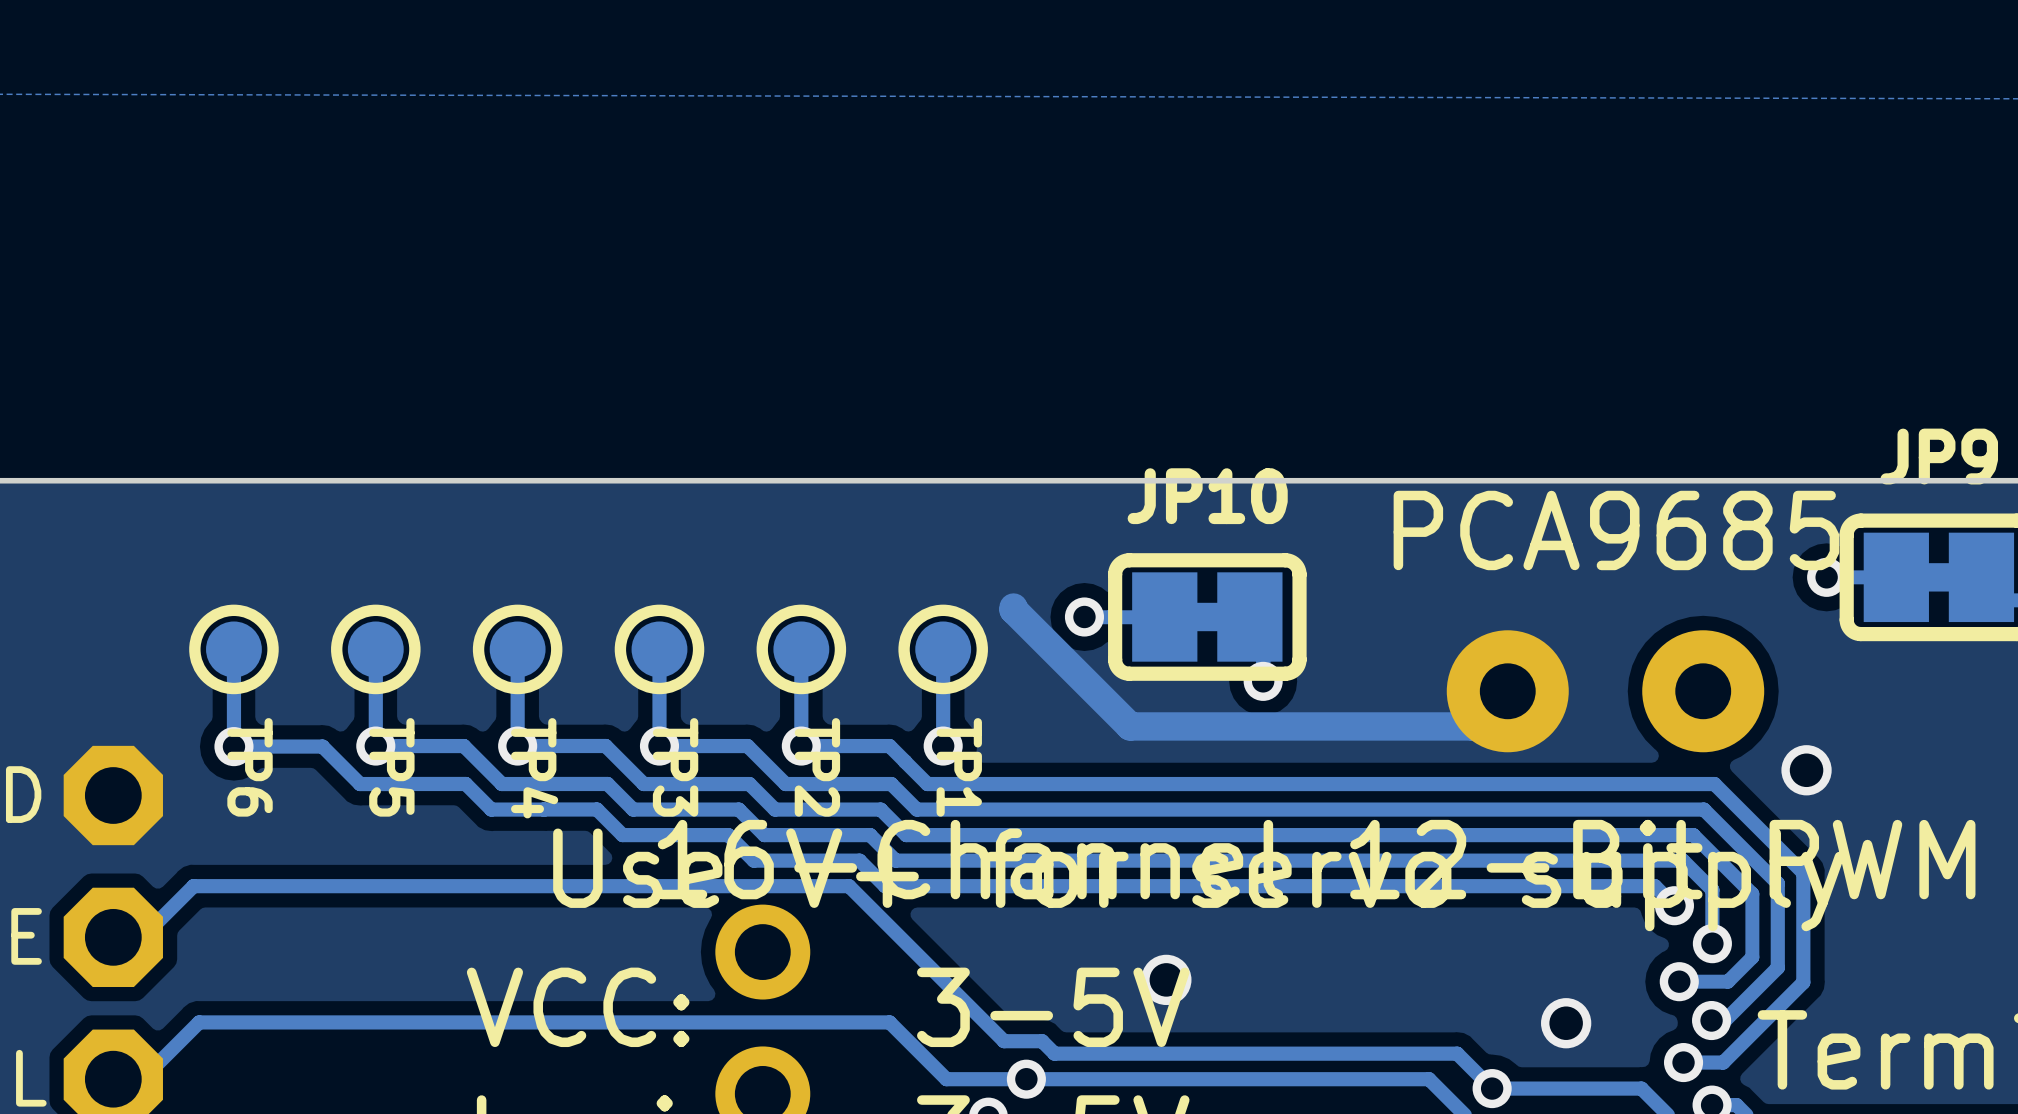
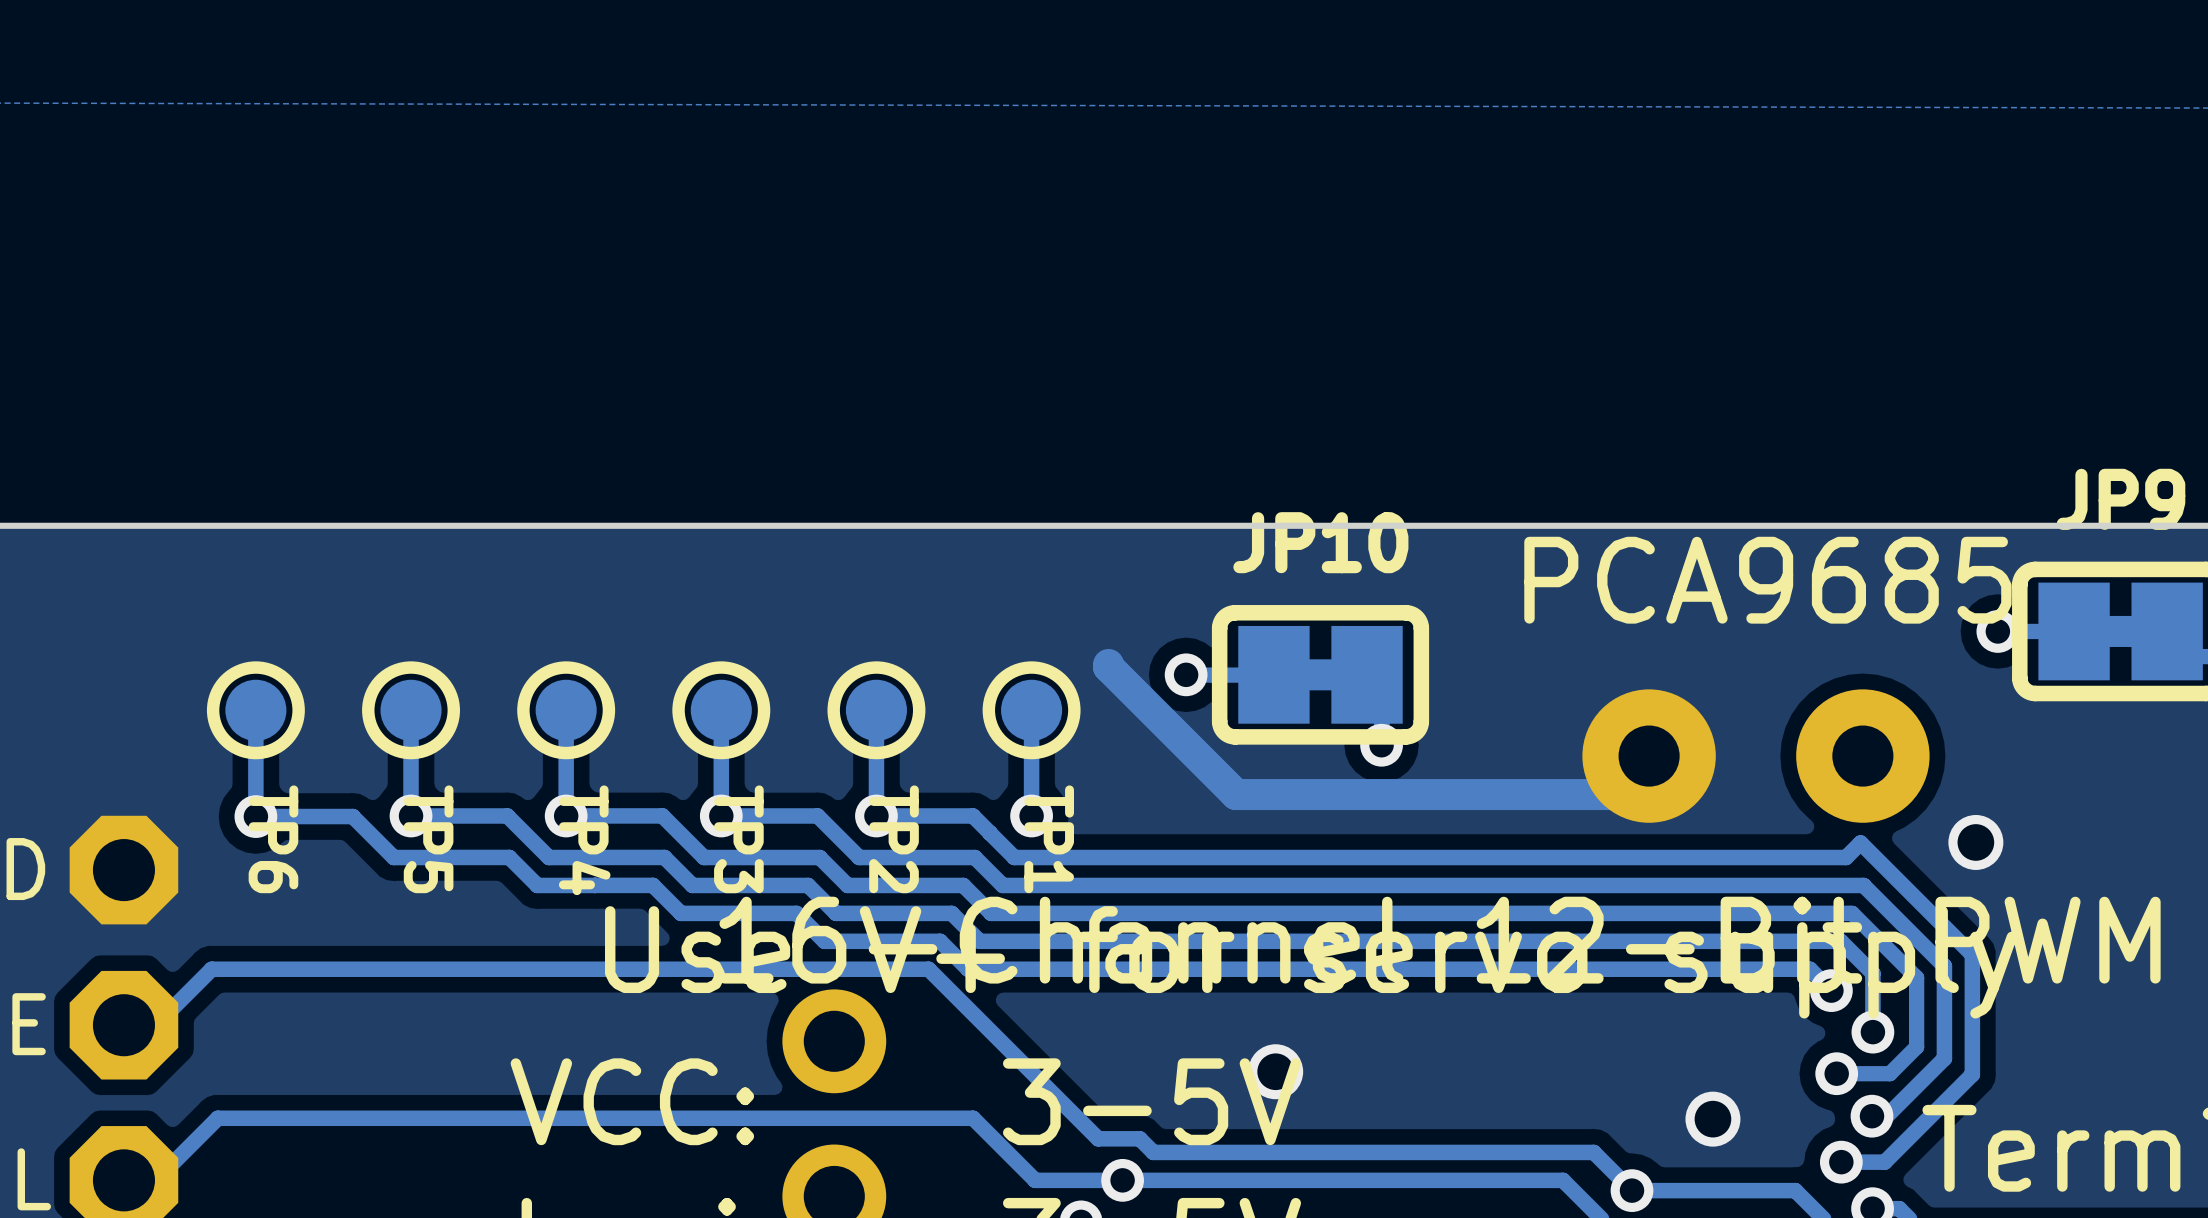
track: (1714, 784) (1687, 784) -> (1875, 857) (1860, 842) (1846, 857)

